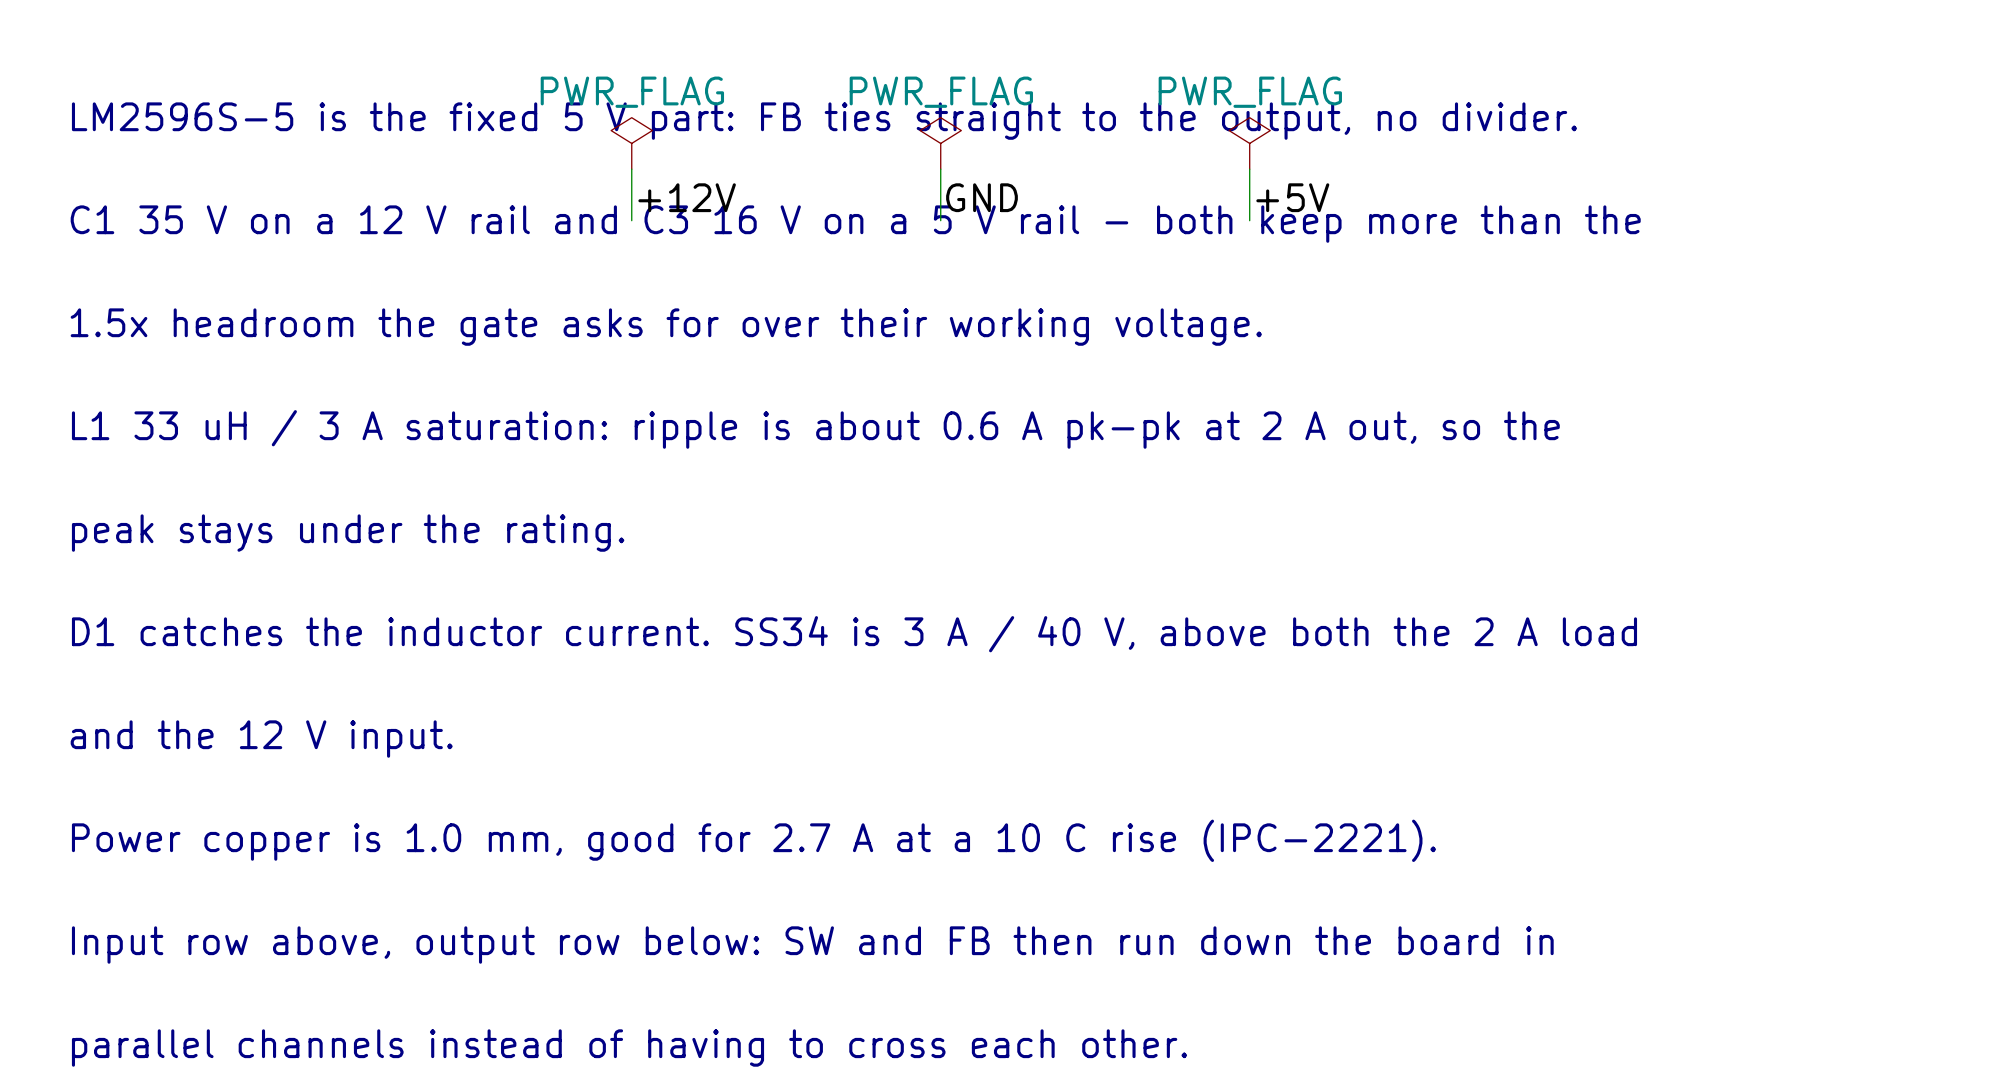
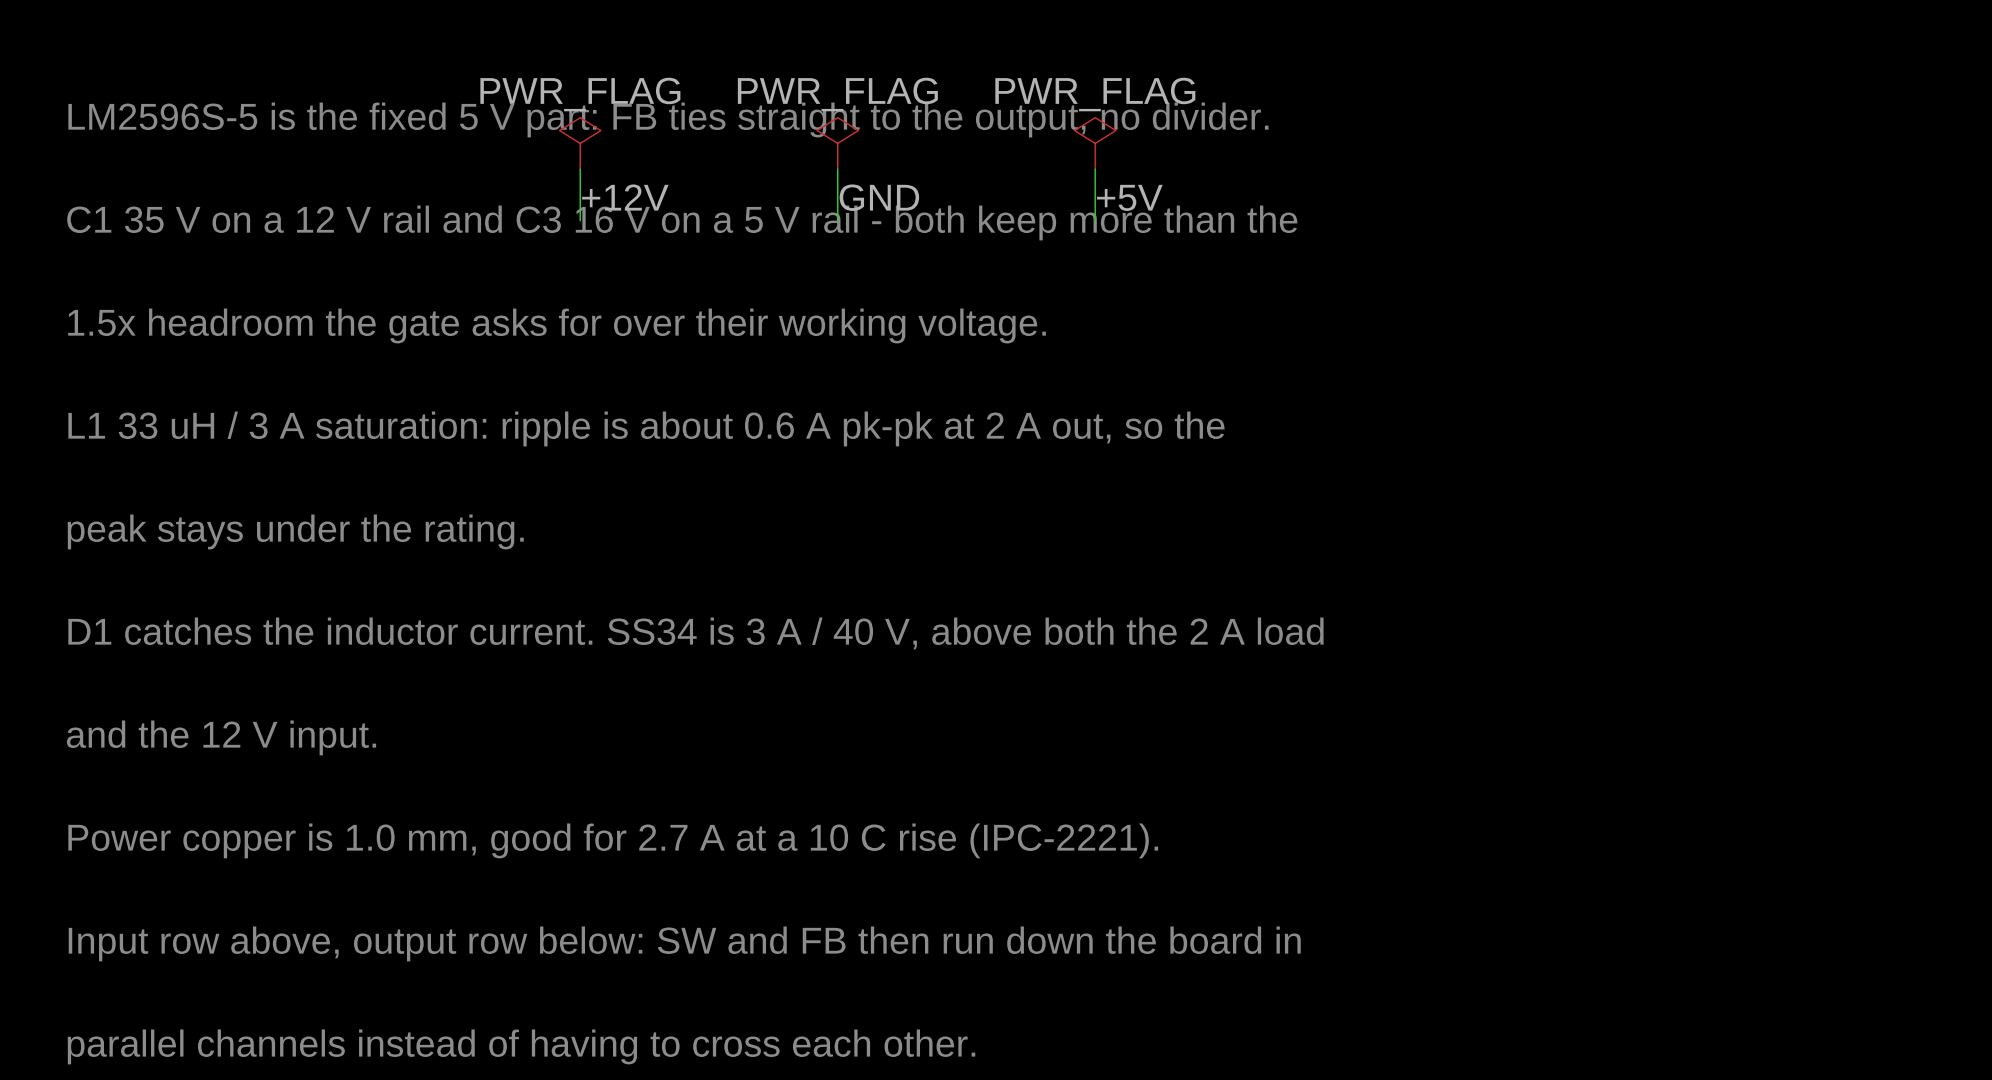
power symbol position: PWR_FLAG (631, 143) -> PWR_FLAG (580, 143)
power symbol: none -> PWR_FLAG (837, 143)
power symbol: PWR_FLAG (940, 143) -> none
power symbol: none -> PWR_FLAG (1095, 143)
power symbol: PWR_FLAG (1249, 143) -> none
wire: (631, 169) (631, 220) -> (580, 169) (580, 220)
wire: (940, 169) (940, 220) -> (837, 169) (837, 220)
wire: (1249, 169) (1249, 220) -> (1095, 169) (1095, 220)
label position: +12V (687, 197) -> +12V (625, 197)
label position: GND (981, 197) -> GND (879, 197)
label position: +5V (1292, 197) -> +5V (1129, 197)

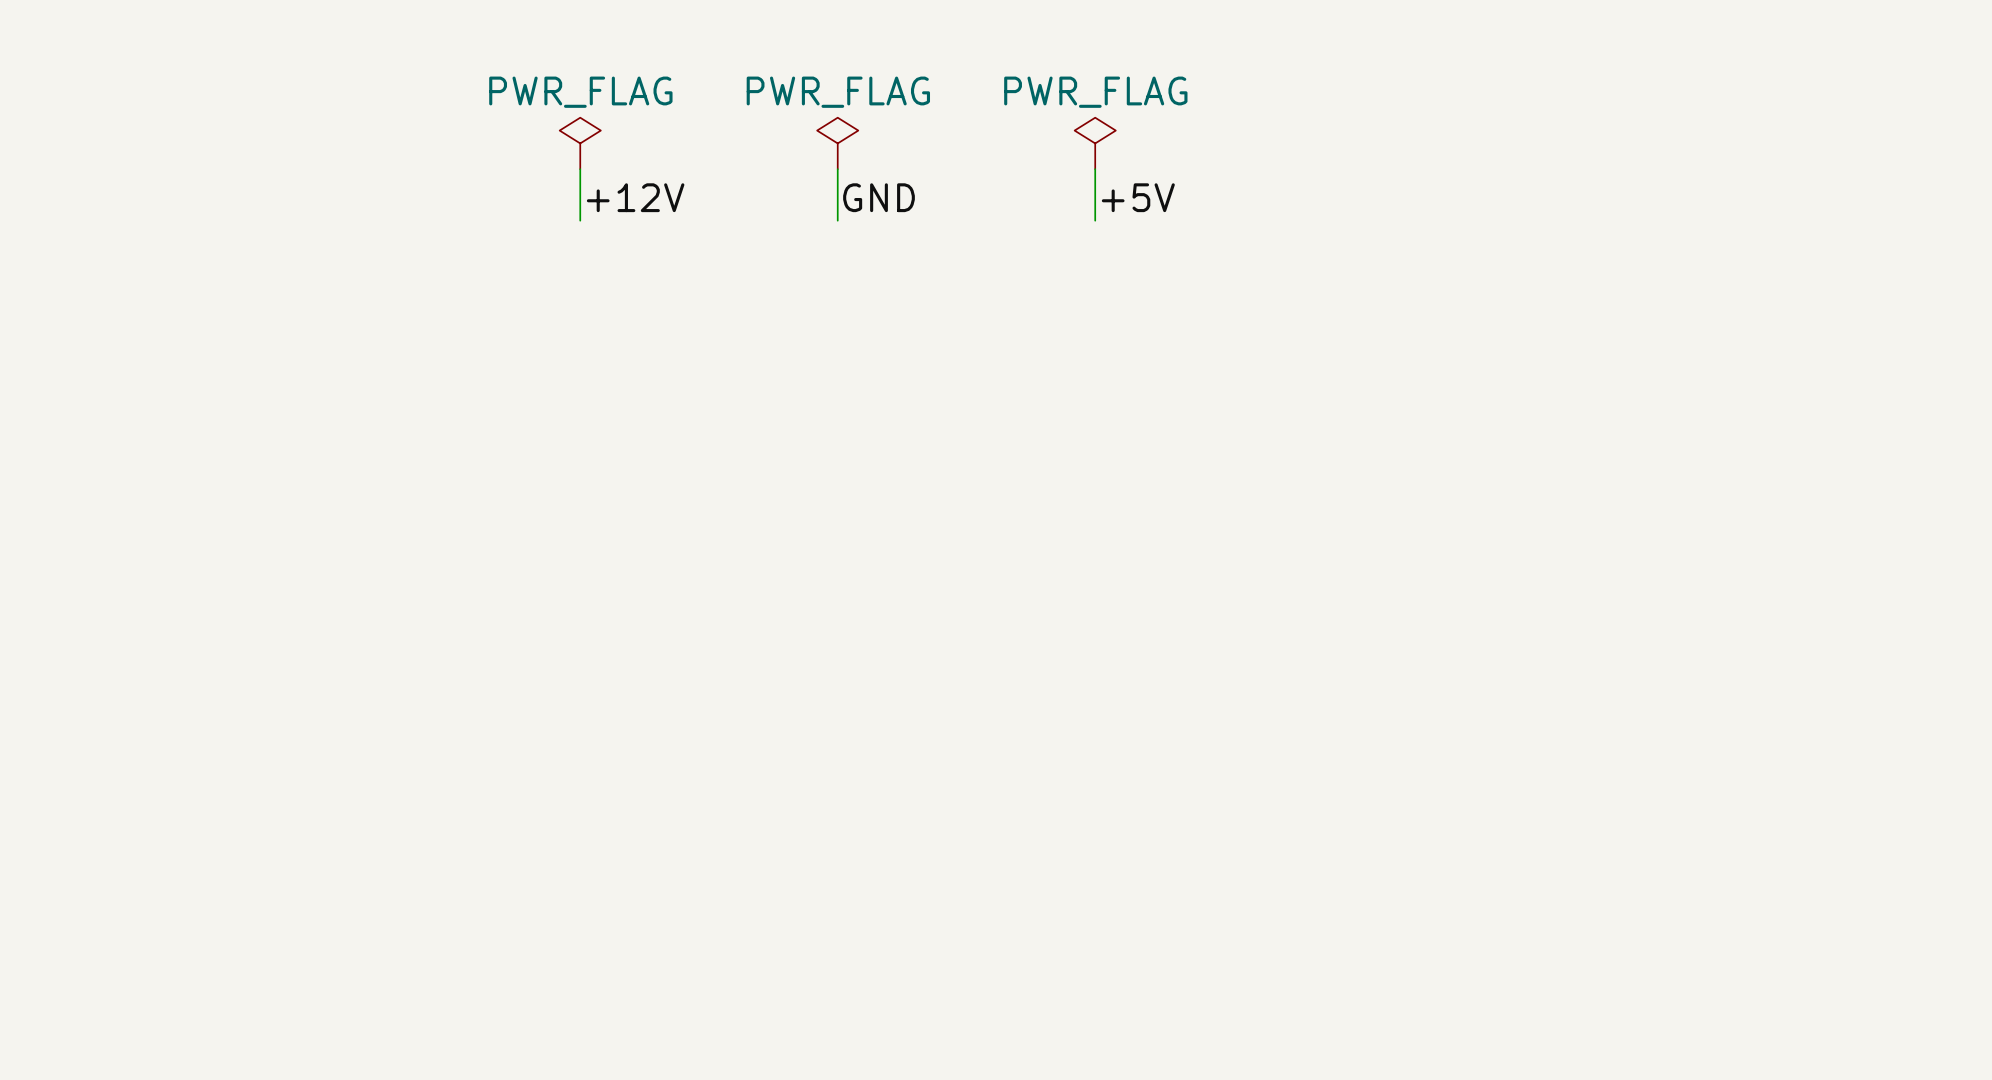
text: LM2596S-5 is the fixed 5 V part: FB ties straight to the output, no divider. (668, 119) -> none
text: C1 35 V on a 12 V rail and C3 16 V on a 5 V rail - both keep more than the (682, 222) -> none
text: 1.5x headroom the gate asks for over their working voltage. (557, 325) -> none
text: L1 33 uH / 3 A saturation: ripple is about 0.6 A pk-pk at 2 A out, so the (646, 428) -> none
text: peak stays under the rating. (295, 531) -> none
text: D1 catches the inductor current. SS34 is 3 A / 40 V, above both the 2 A load (696, 633) -> none
text: and the 12 V input. (221, 737) -> none
text: Power copper is 1.0 mm, good for 2.7 A at a 10 C rise (IPC-2221). (613, 840) -> none
text: Input row above, output row below: SW and FB then run down the board in (684, 943) -> none
text: parallel channels instead of having to cross each other. (521, 1046) -> none

